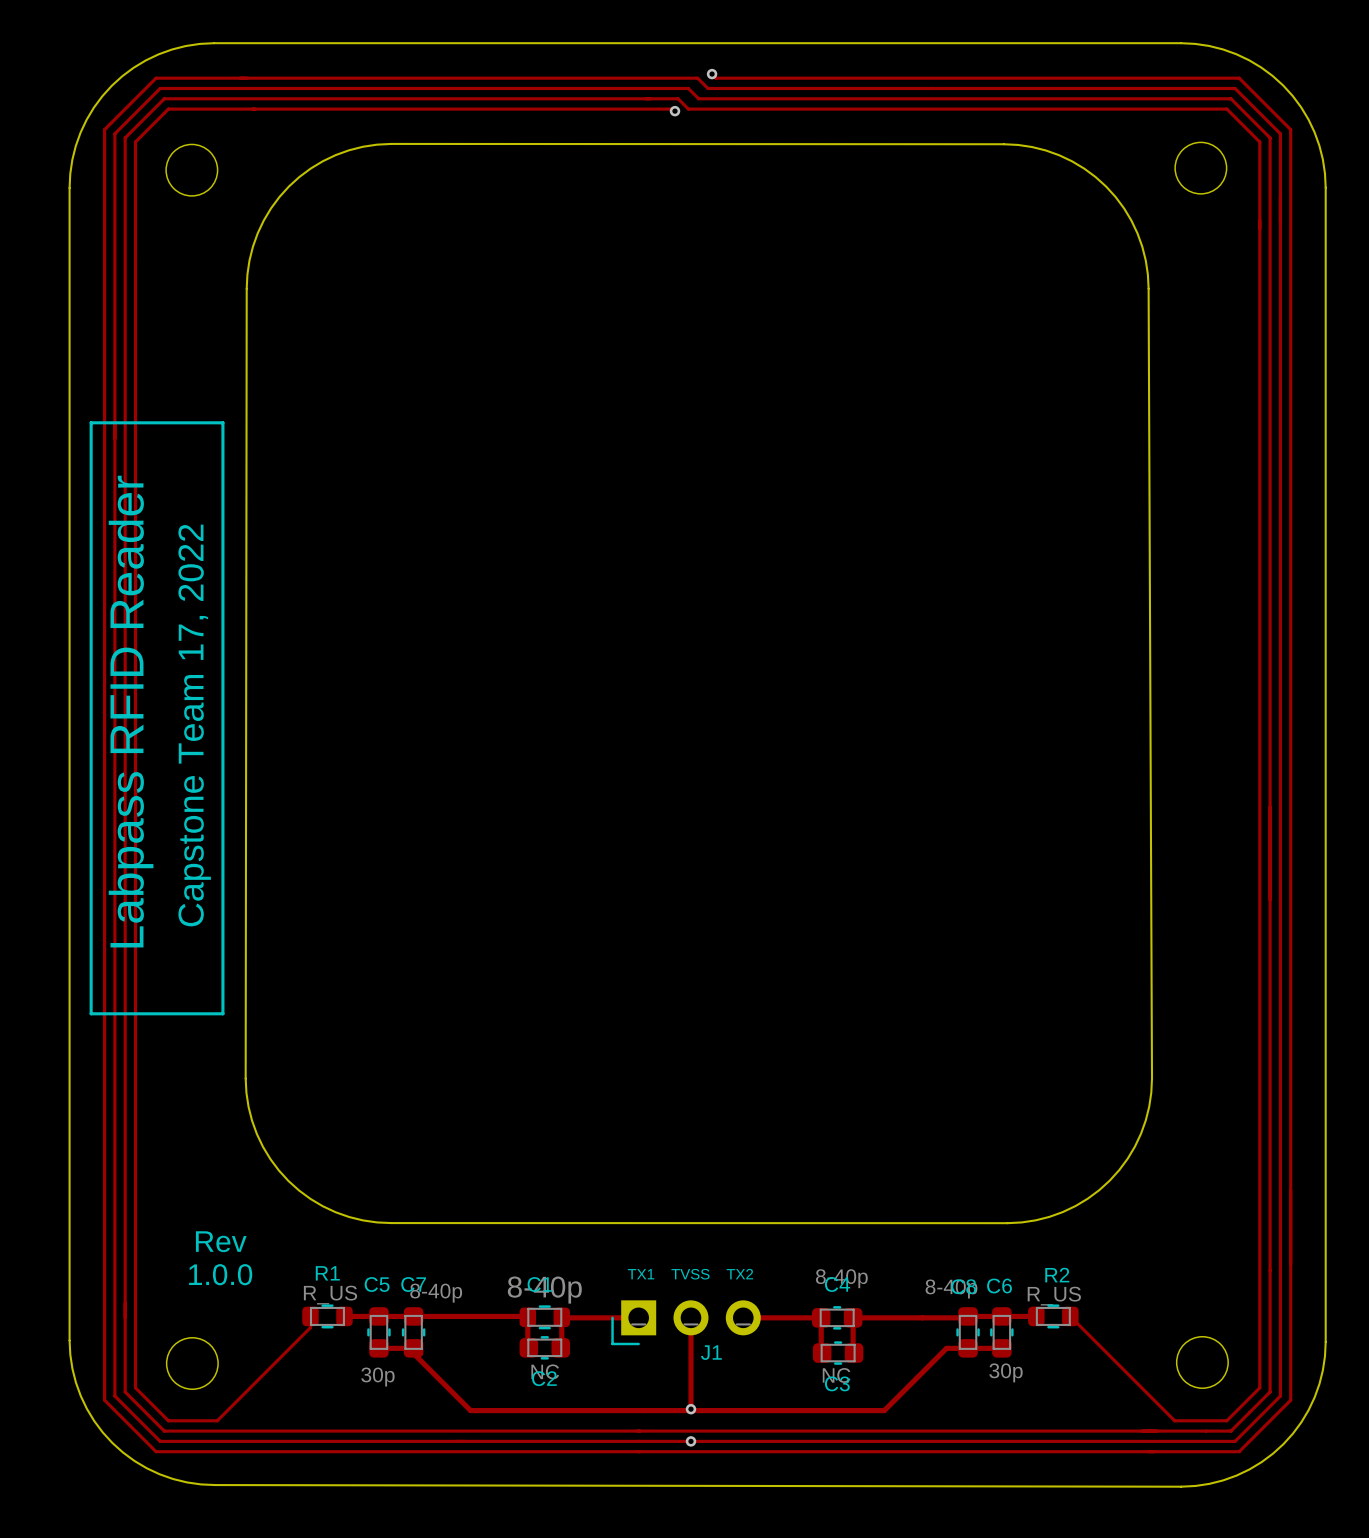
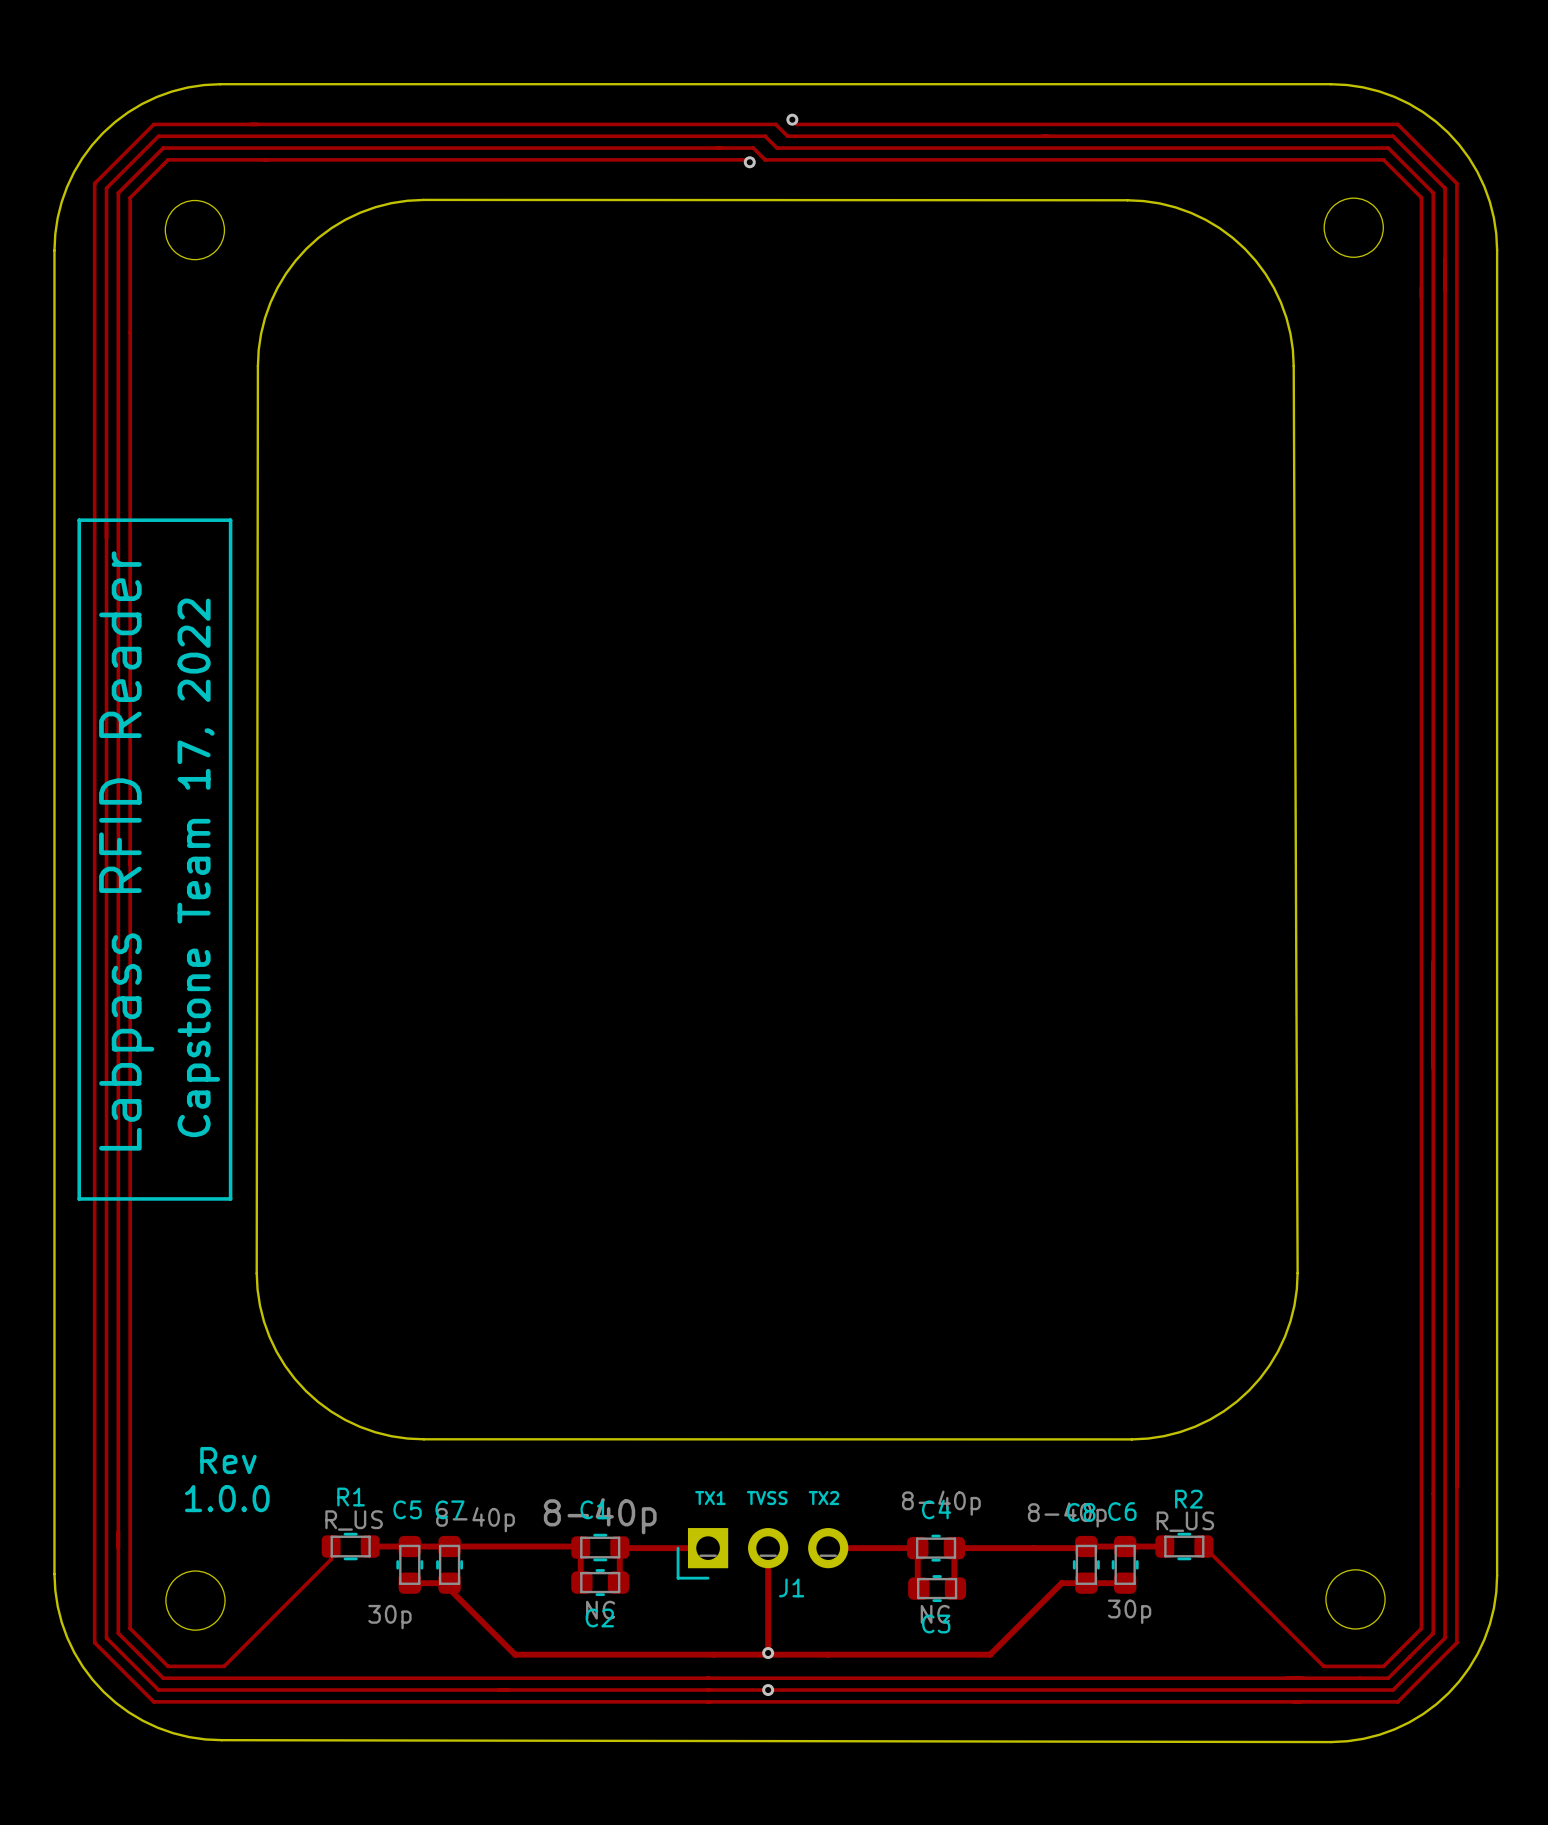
C5 value position: 30p (377, 1377) -> 30p (389, 1617)

